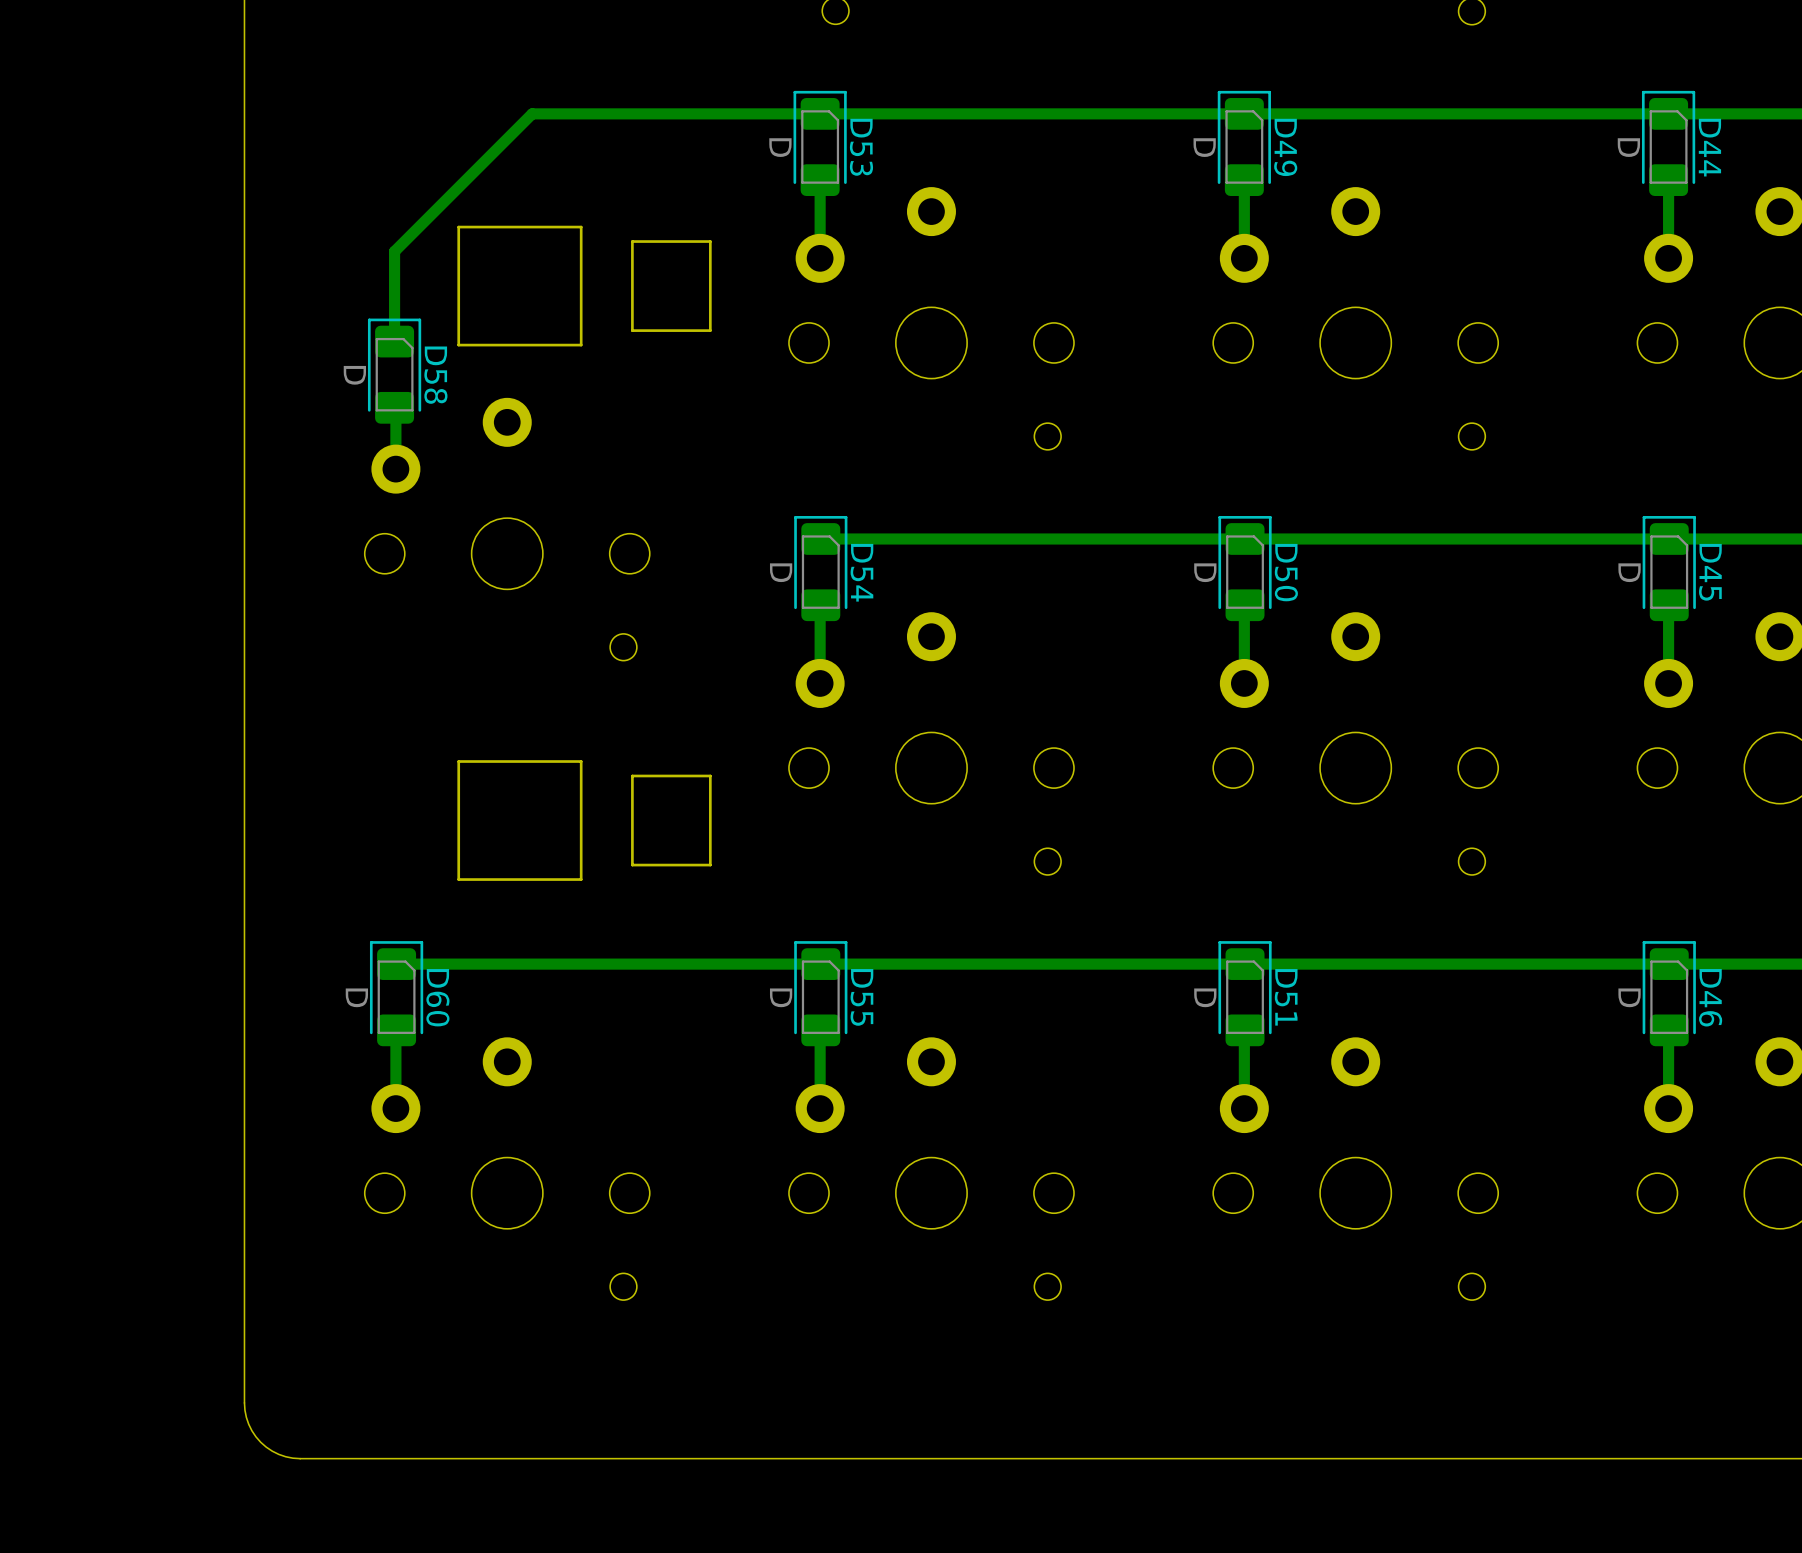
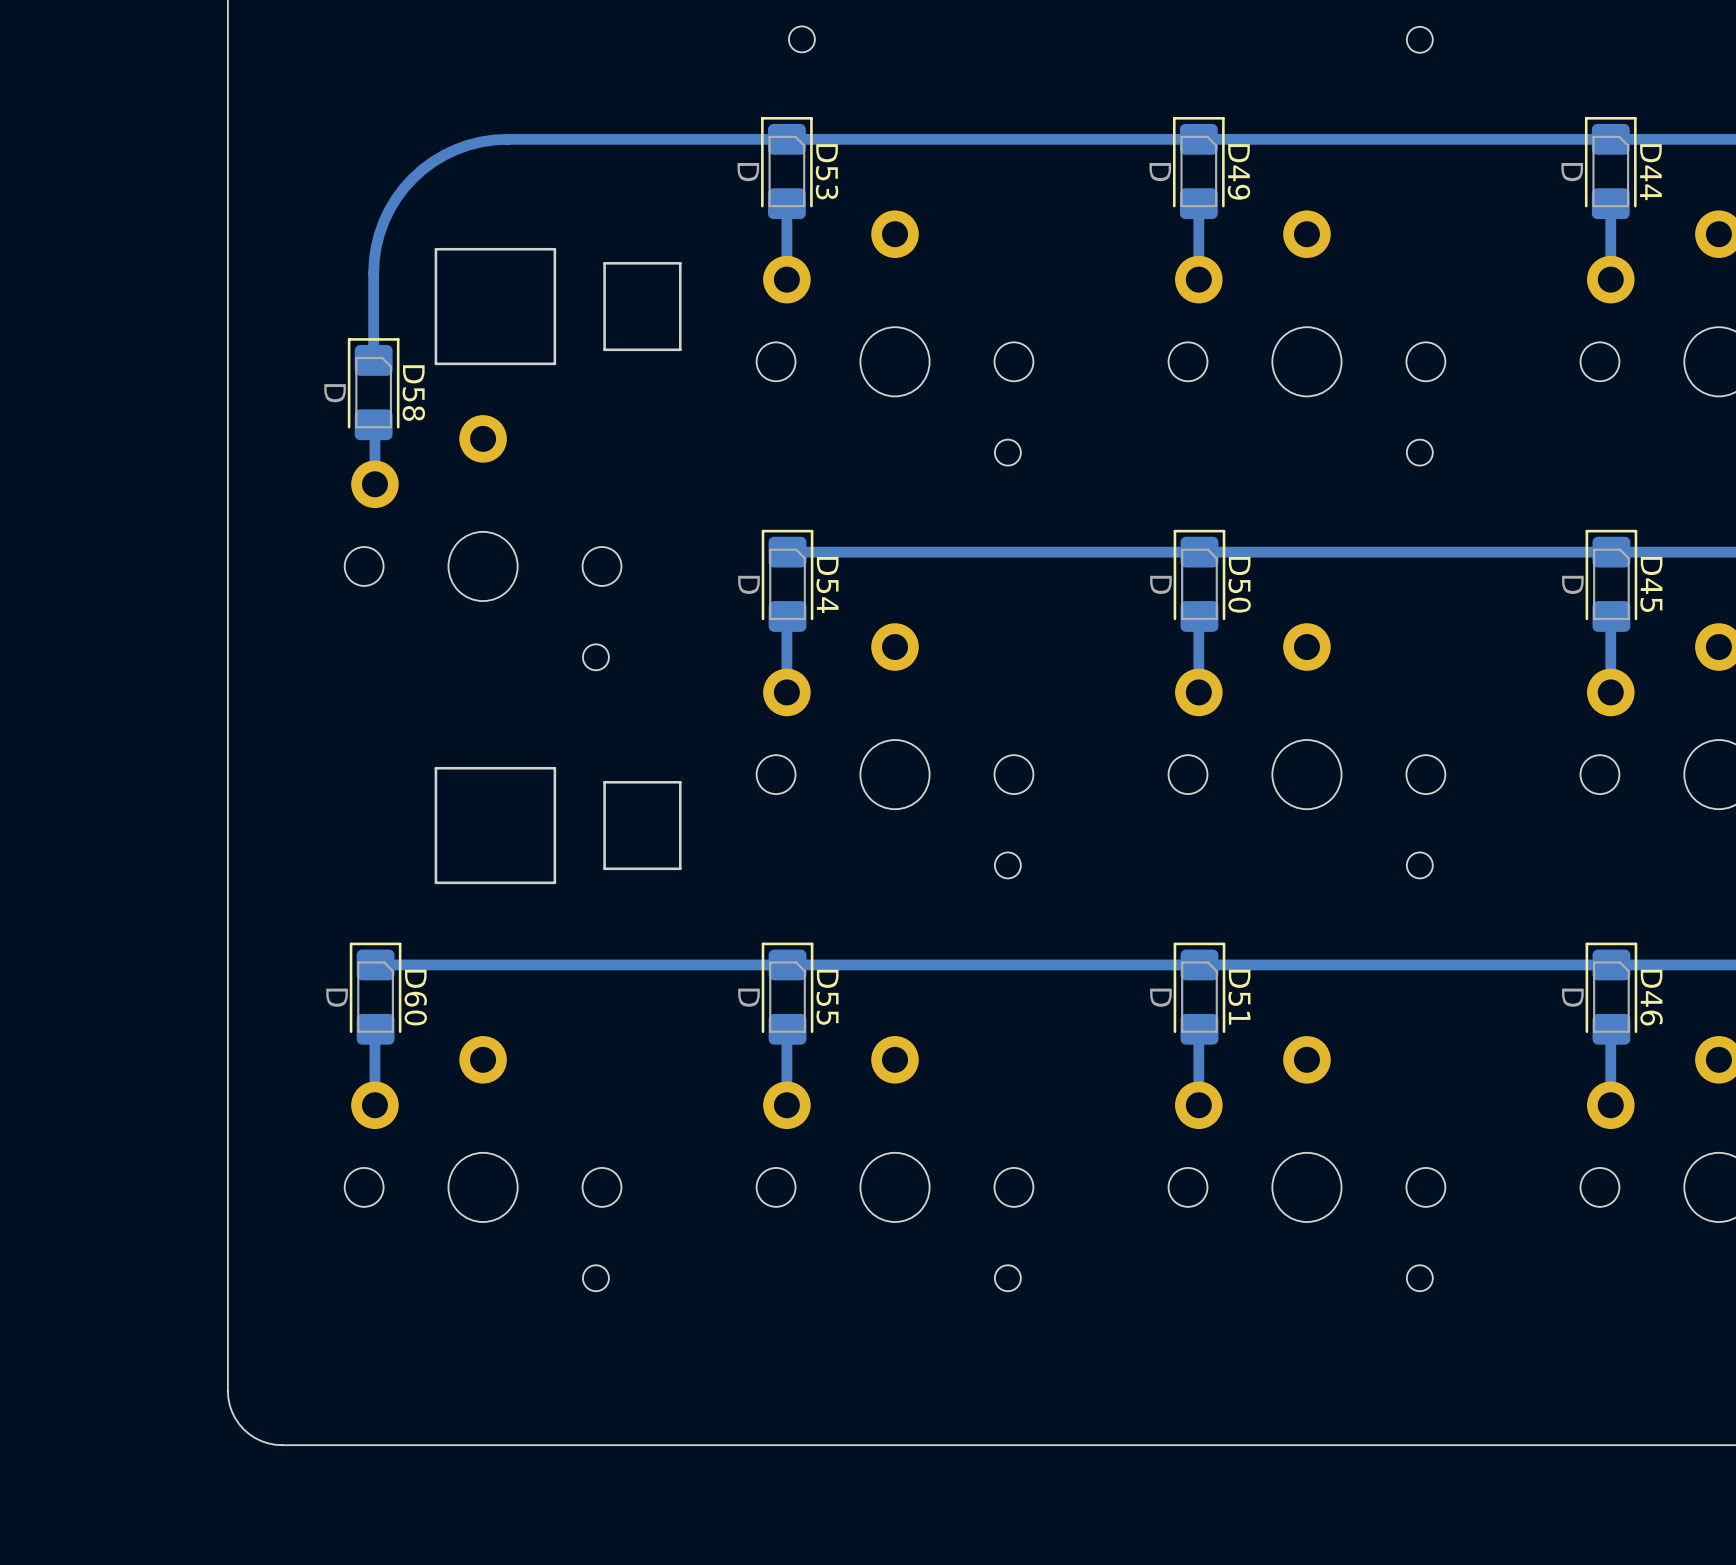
track: (532, 113) (394, 251) -> (507, 139) (481, 141) (456, 149) (433, 161) (412, 178) (396, 198) (383, 221) (376, 246) (373, 272)

